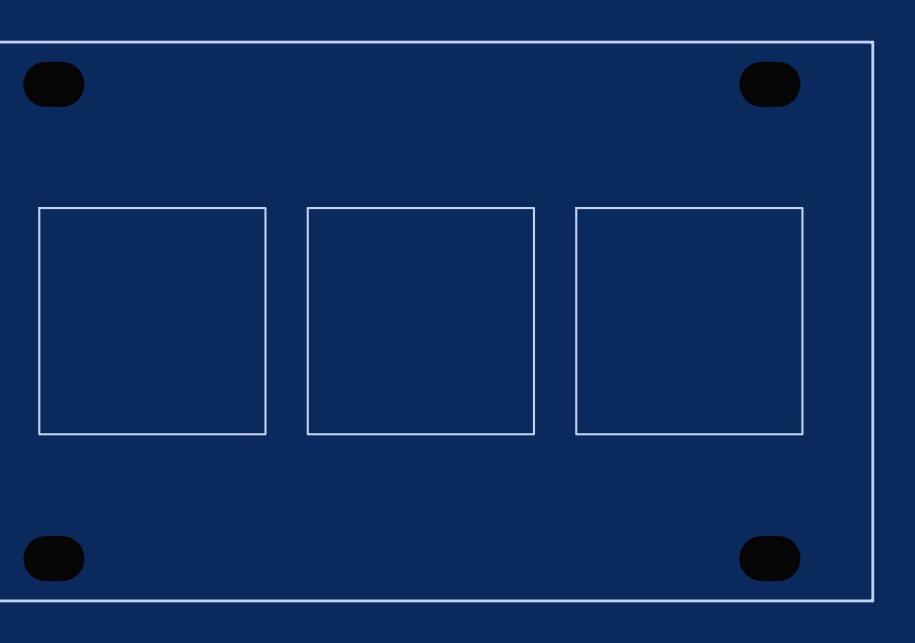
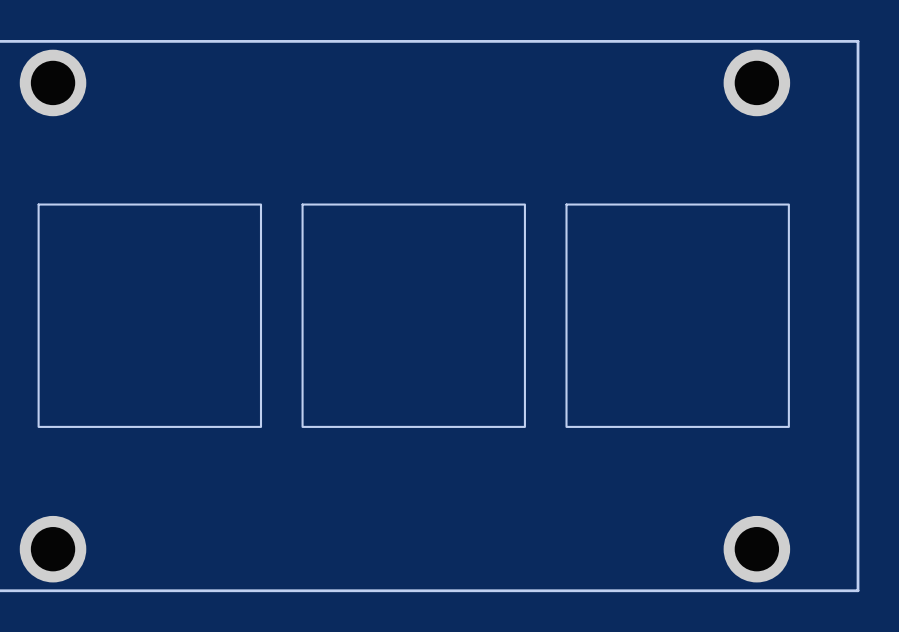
part footprint: [23, 61, 85, 107] -> [19, 49, 87, 117]
part footprint: [739, 61, 801, 107] -> [723, 49, 791, 117]
part footprint: [23, 536, 85, 582] -> [19, 515, 87, 583]
part footprint: [739, 536, 801, 582] -> [723, 515, 791, 583]

